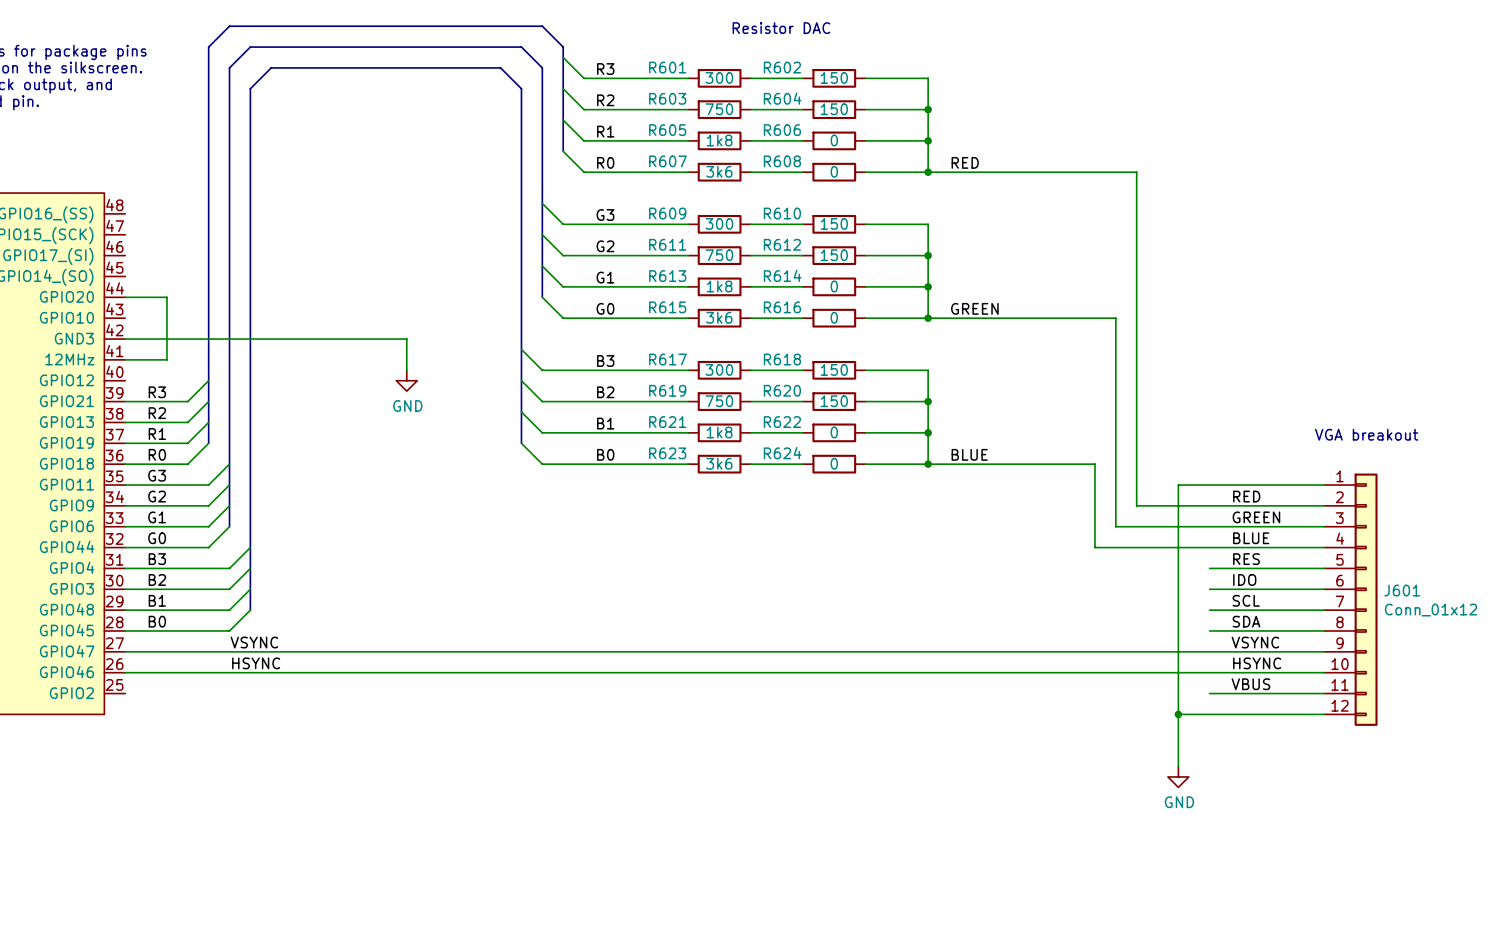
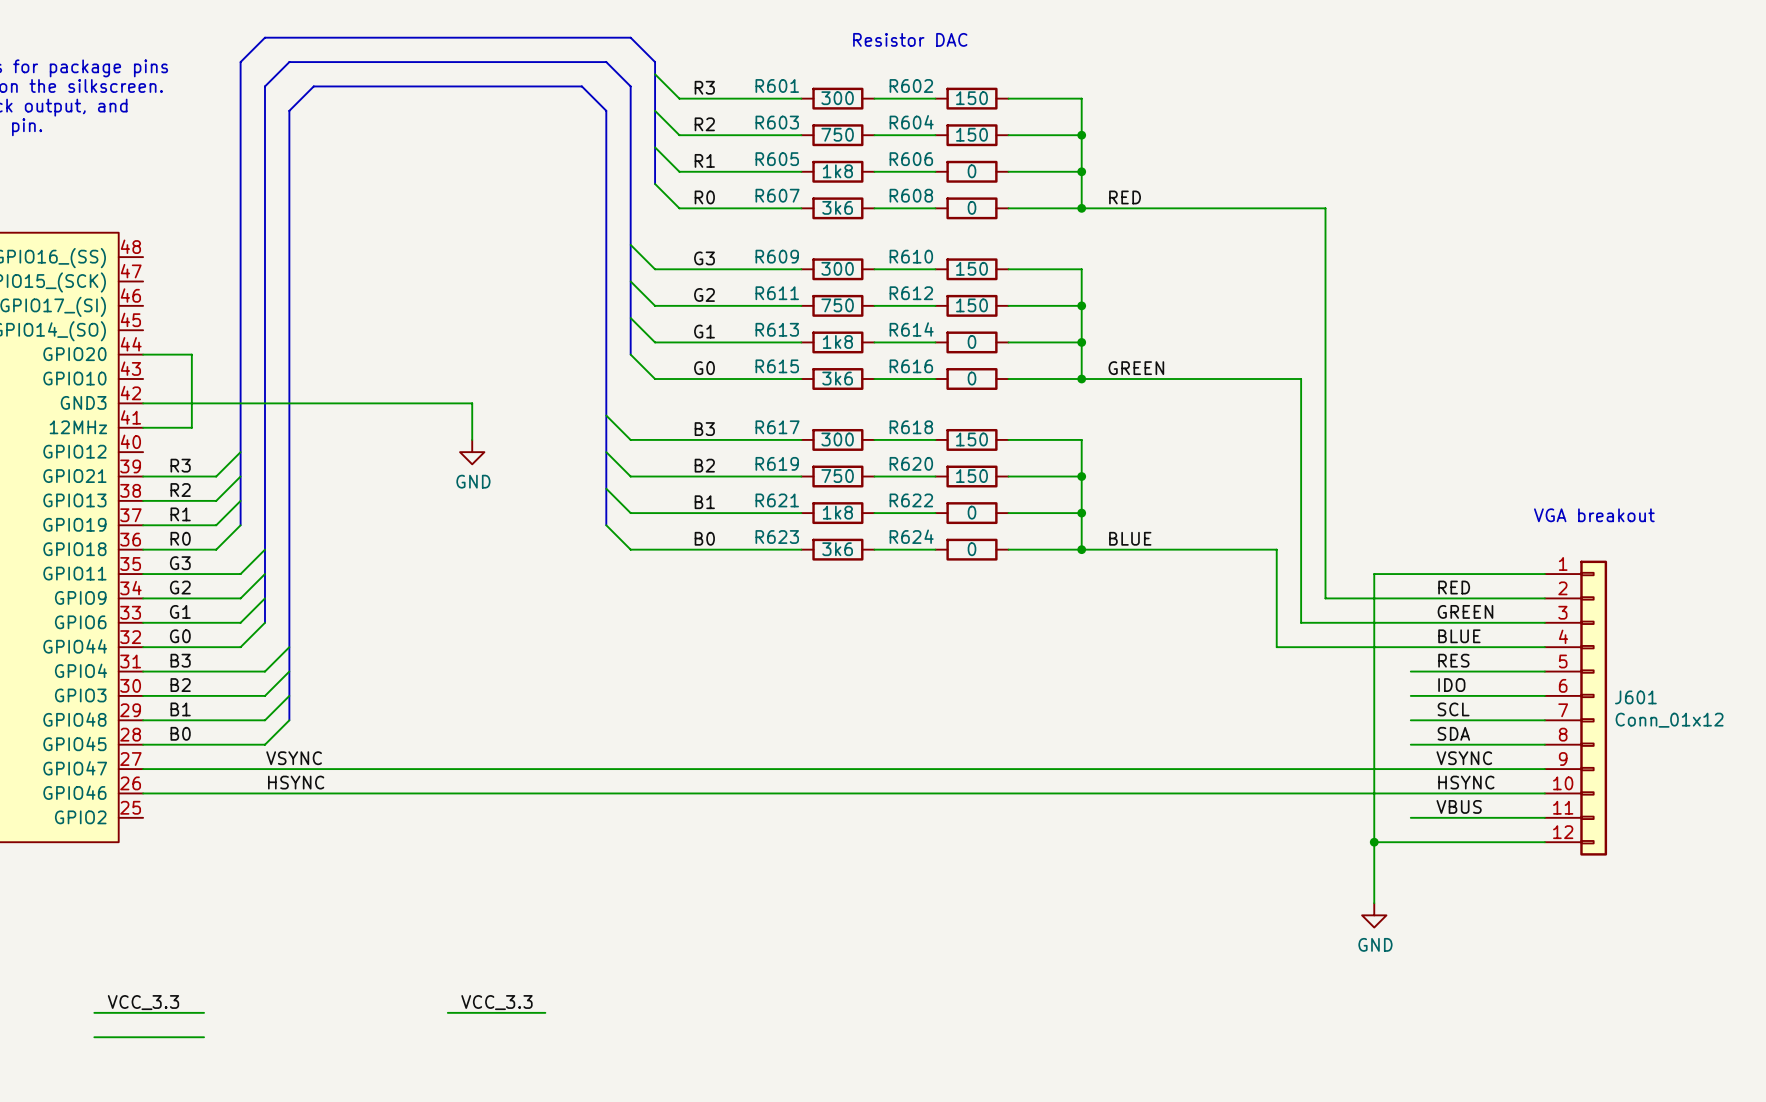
label: none -> VCC_3.3 (143, 1002)
label: none -> VCC_3.3 (496, 1002)
wire: none -> (94, 1012) (204, 1012)
wire: none -> (447, 1012) (545, 1012)
wire: none -> (94, 1037) (204, 1037)

